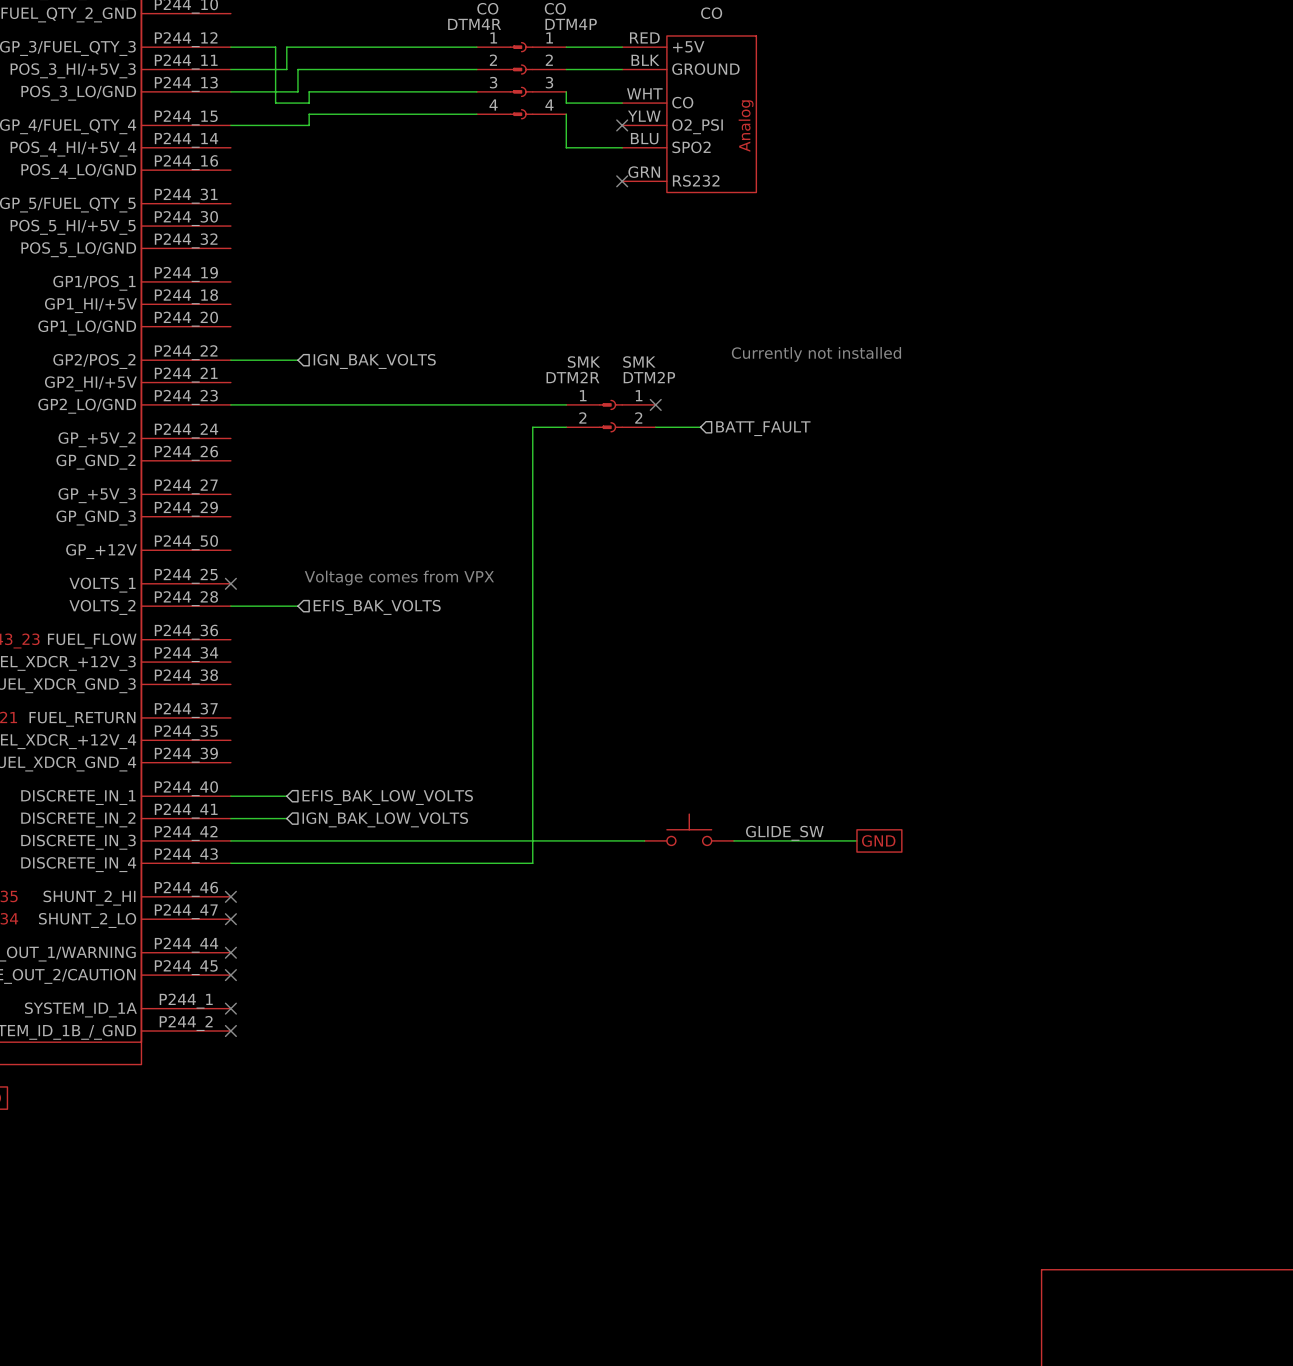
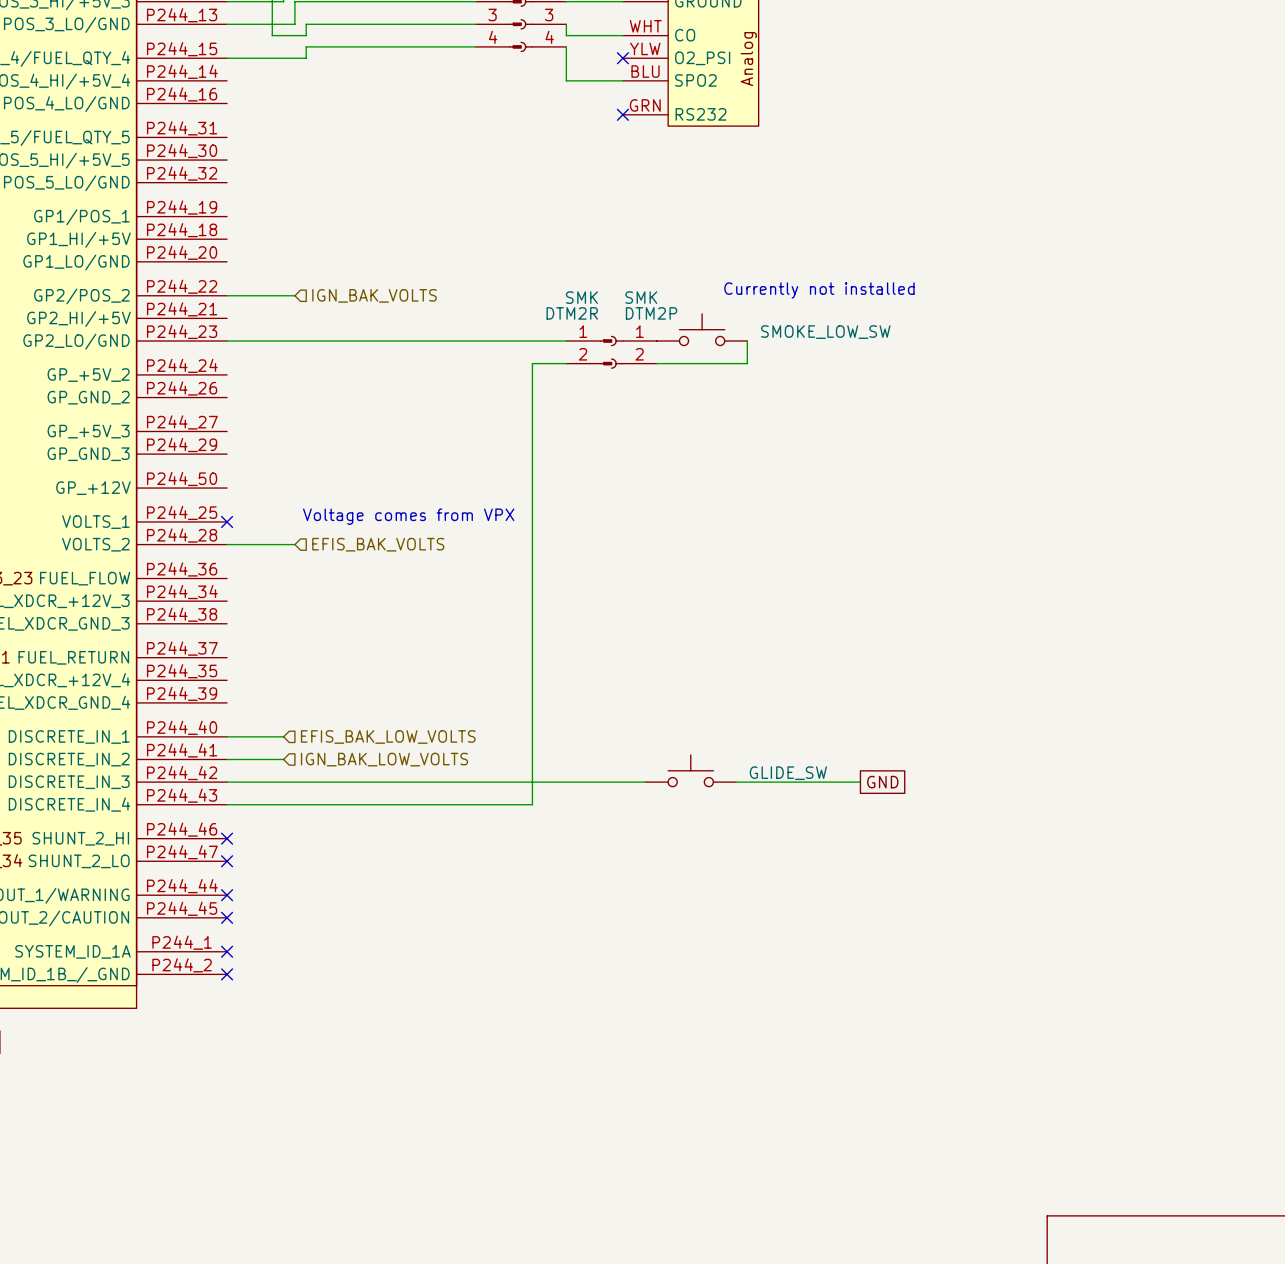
SMOKE_LOW_SW: none -> (702, 329)
no-connect mark: (655, 404) -> none
wire: none -> (747, 341) (747, 363) (702, 363)
hierarchical label: BATT_FAULT (763, 428) -> none

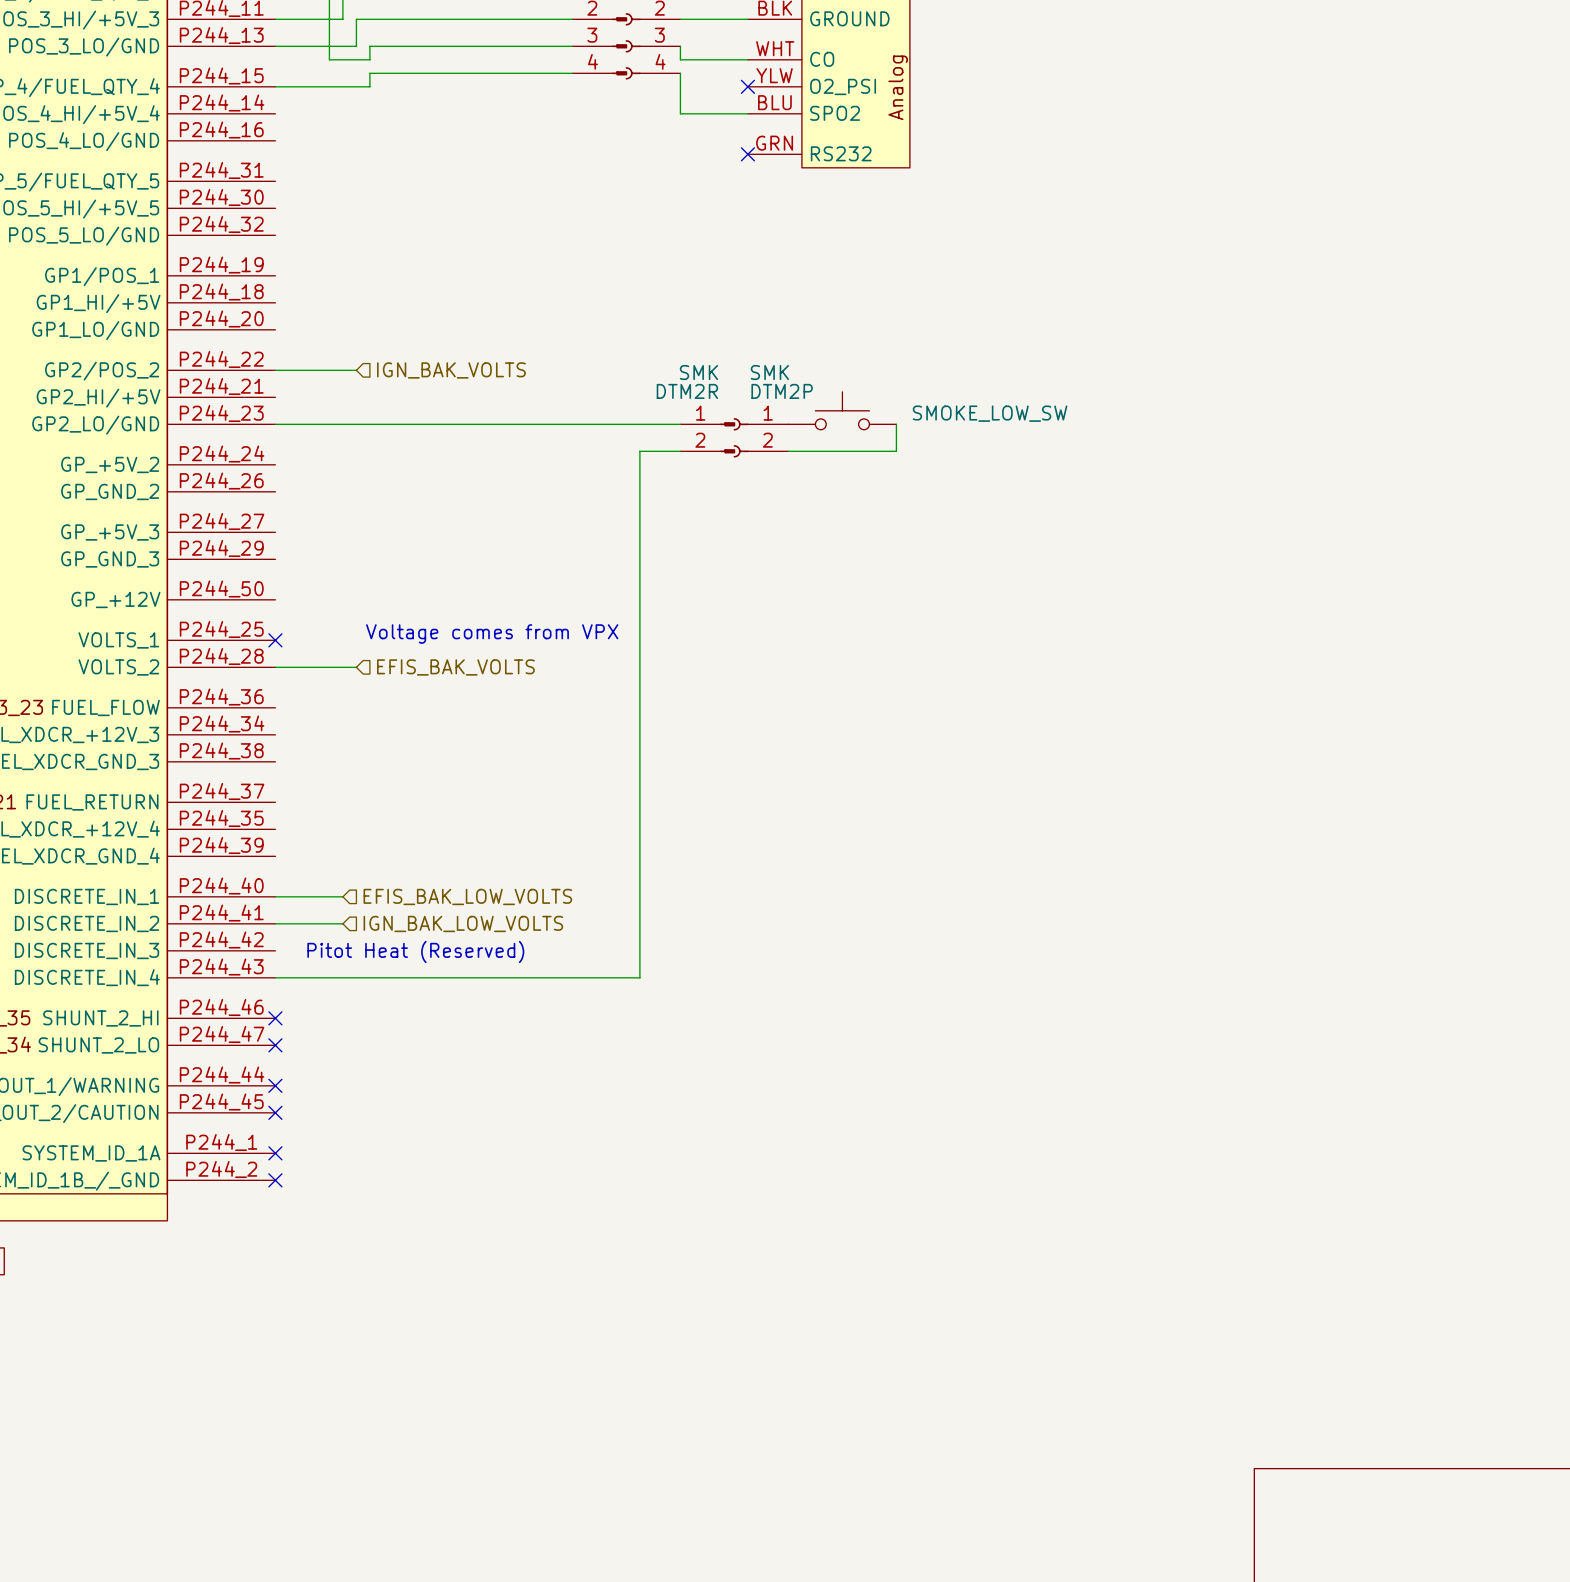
text: Currently not installed (819, 290) -> none
GLIDE_SW: (690, 770) -> none
wire: (227, 782) (645, 782) -> none
wire: (736, 782) (860, 782) -> none
global label: GND (882, 782) -> none
text: none -> Pitot Heat (Reserved) (415, 951)

